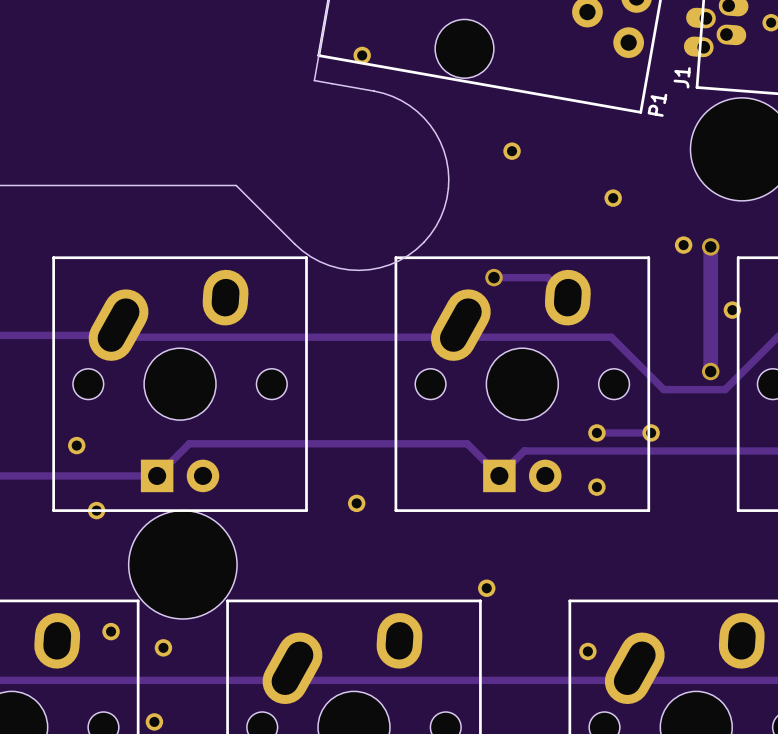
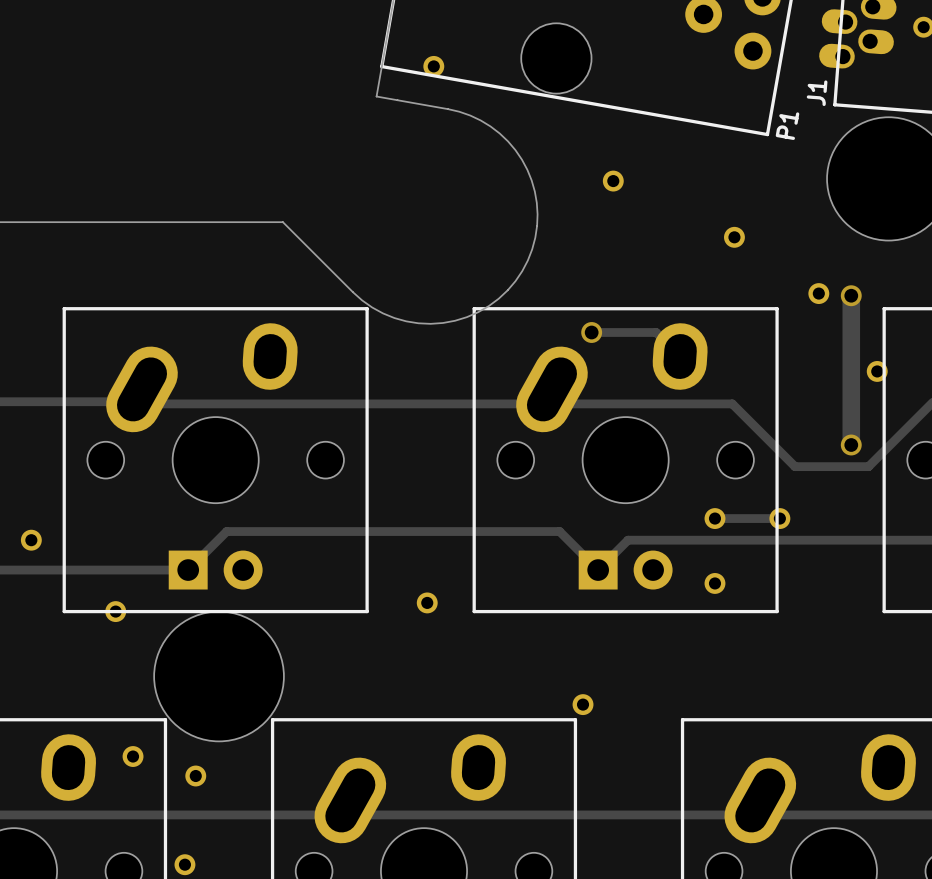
part position: (76, 445) -> (31, 540)
part: (587, 651) -> none

